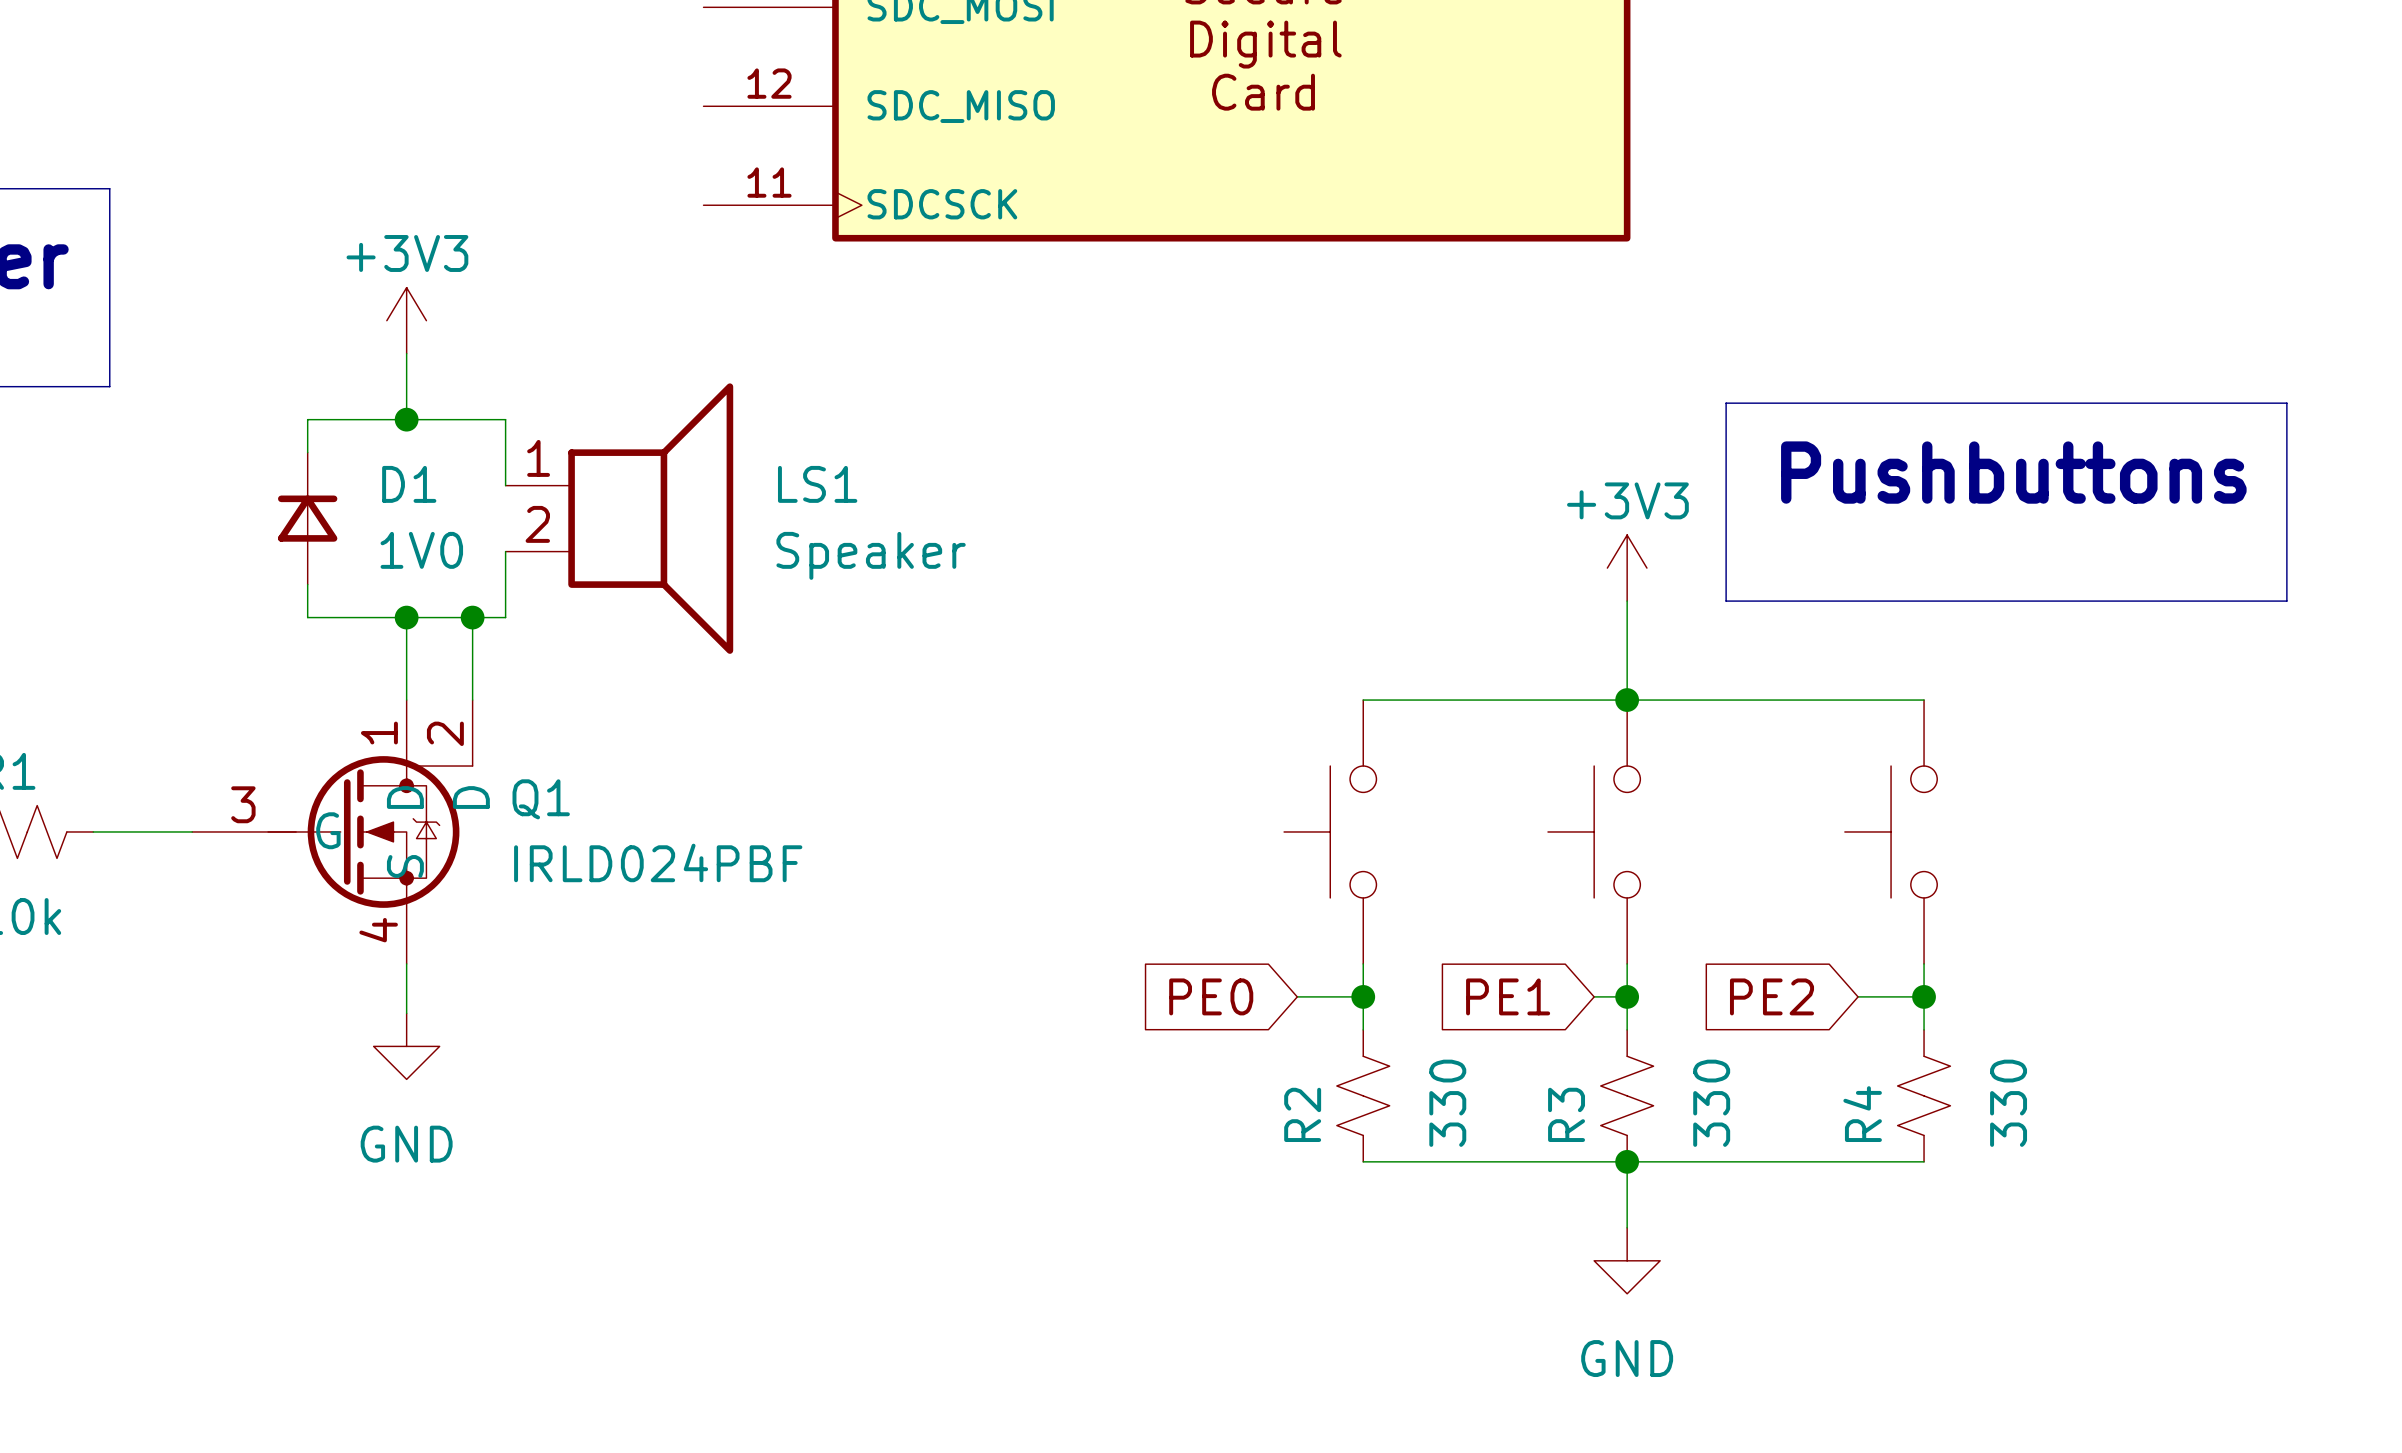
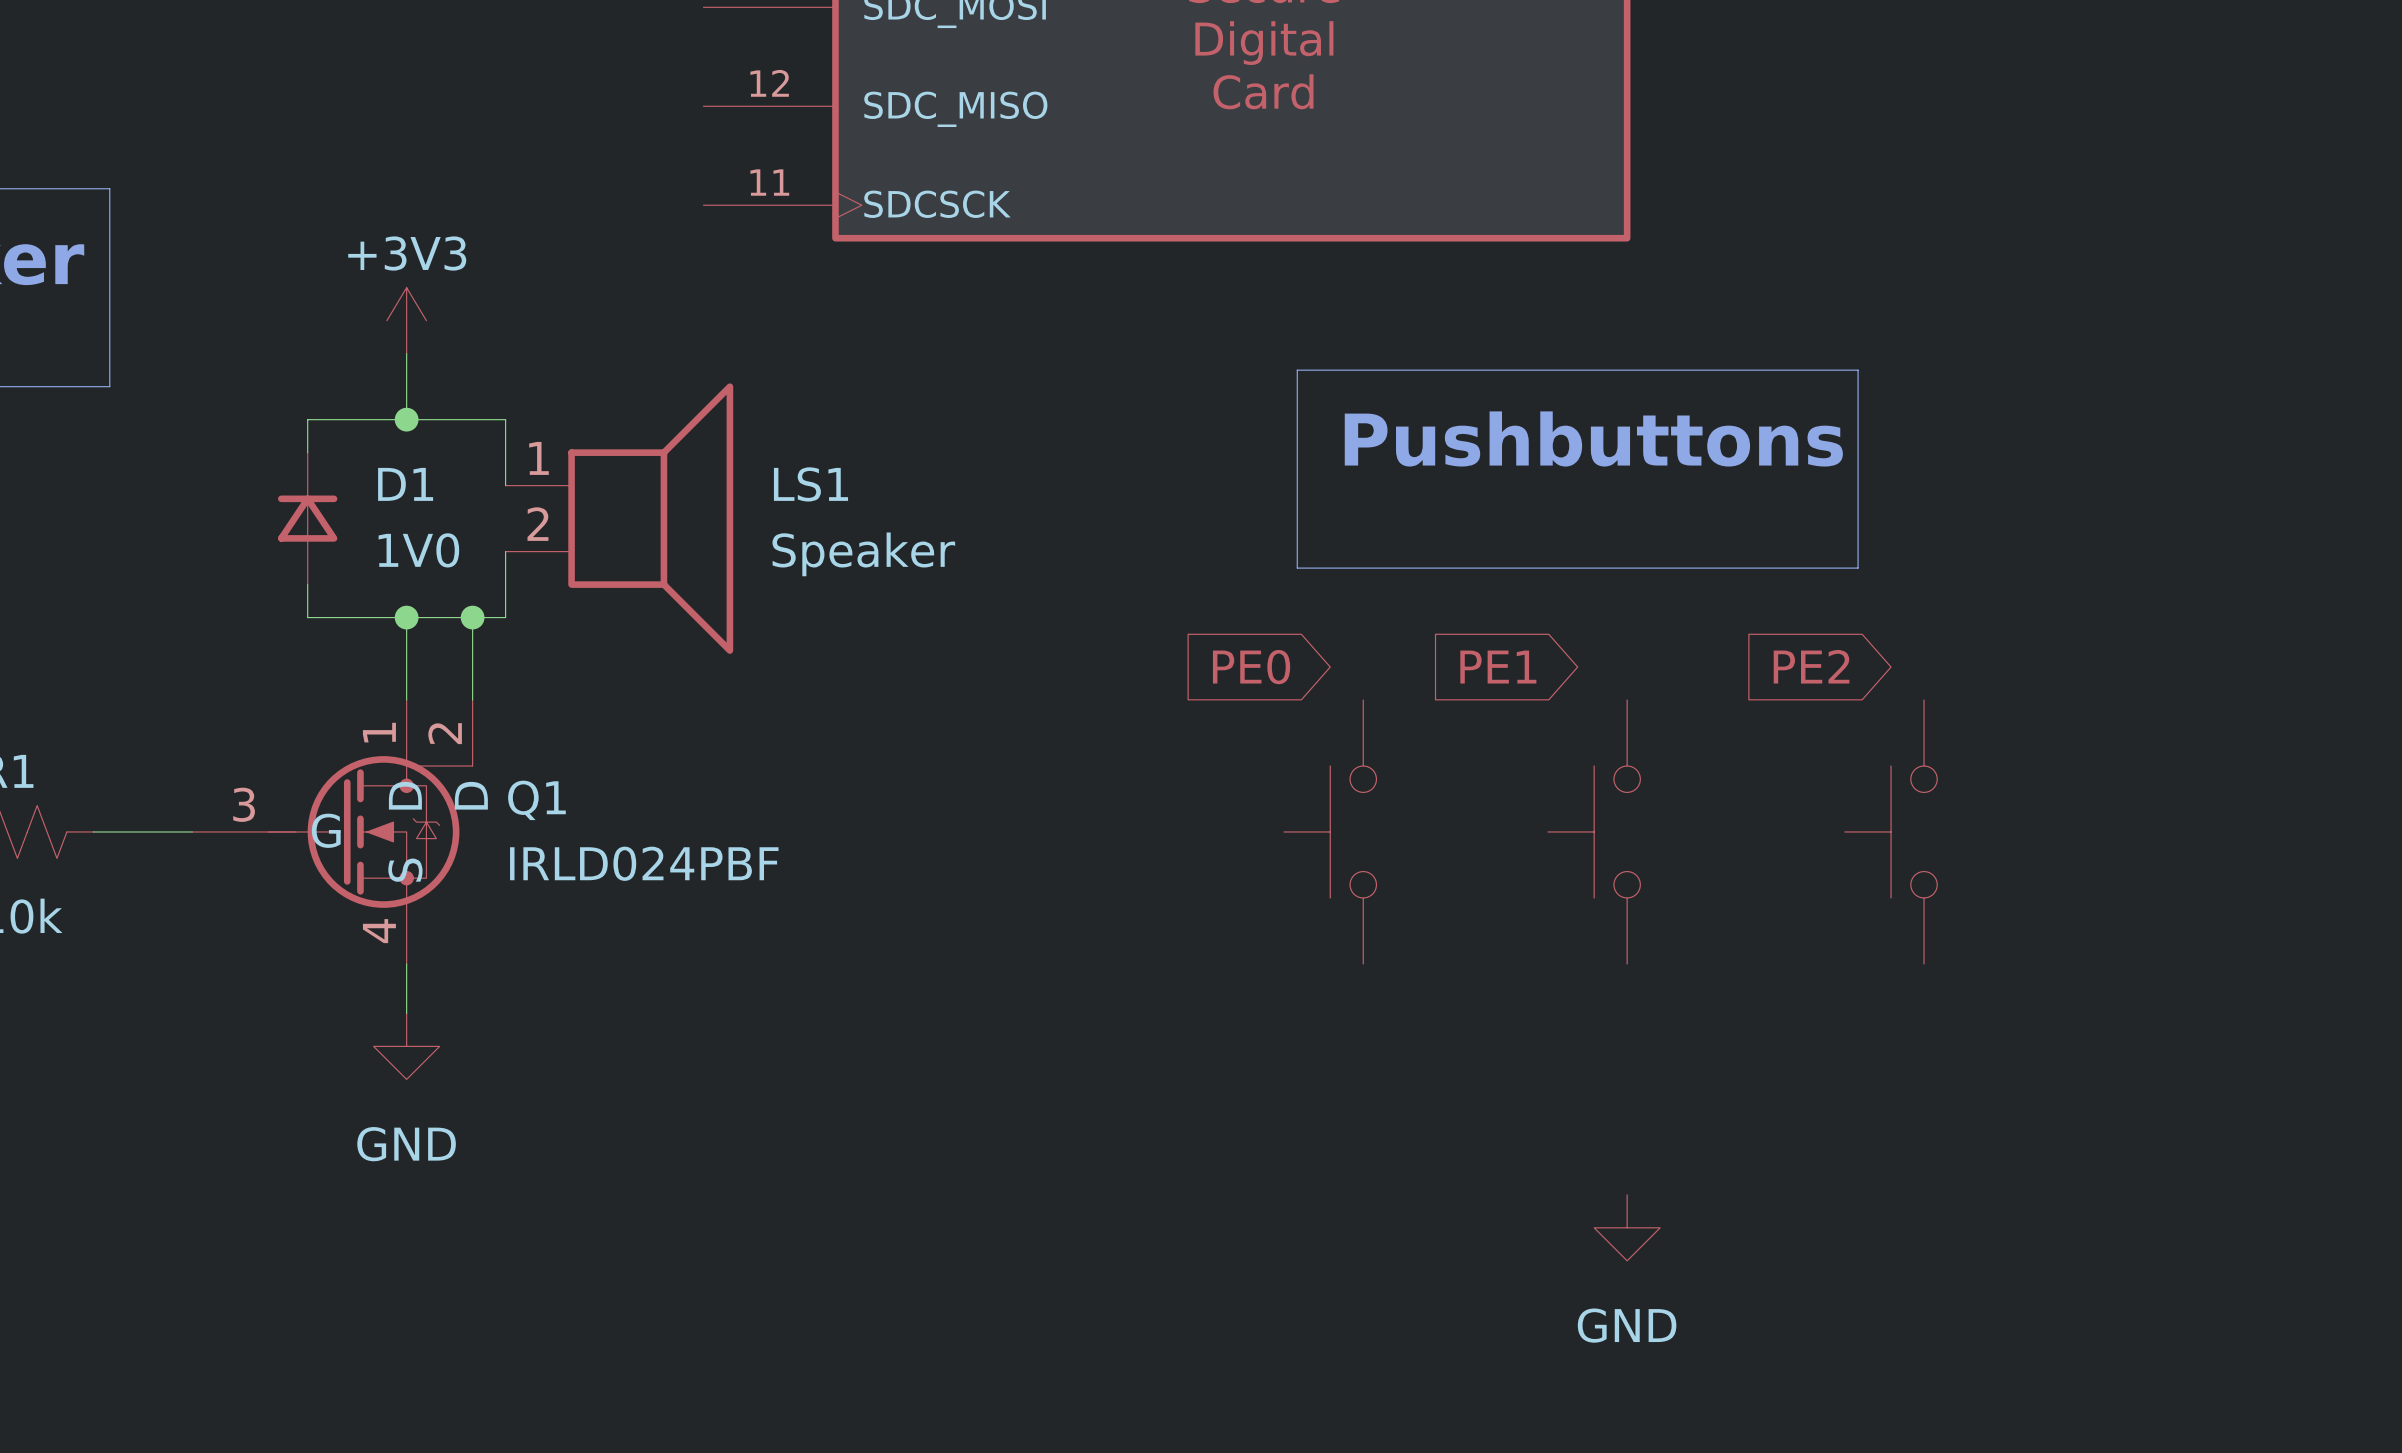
line: (1726, 403) (2286, 403) (2286, 601) (1726, 601) (1726, 403) -> (1297, 370) (1858, 370) (1858, 568) (1297, 568) (1297, 370)
text position: Pushbuttons (2013, 472) -> Pushbuttons (1593, 438)
power symbol: +3V3 (1627, 568) -> none
wire: (1627, 601) (1627, 700) -> none
wire: (1363, 700) (1924, 700) -> none
junction: (1627, 700) -> none
wire: (1363, 963) (1363, 1029) -> none
wire: (1627, 963) (1627, 1029) -> none
wire: (1924, 963) (1924, 1029) -> none
global label position: PE0 (1211, 996) -> PE0 (1251, 667)
wire: (1297, 996) (1363, 996) -> none
junction: (1363, 996) -> none
global label position: PE1 (1508, 996) -> PE1 (1498, 667)
wire: (1594, 996) (1627, 996) -> none
junction: (1627, 996) -> none
global label position: PE2 (1772, 996) -> PE2 (1811, 666)
wire: (1858, 996) (1924, 996) -> none
junction: (1924, 996) -> none
R2: 330 (1363, 1095) -> none
R3: 330 (1627, 1095) -> none
R4: 330 (1924, 1095) -> none
wire: (1363, 1161) (1924, 1161) -> none
wire: (1627, 1161) (1627, 1227) -> none
junction: (1627, 1161) -> none
power symbol position: GND (1627, 1260) -> GND (1627, 1227)

